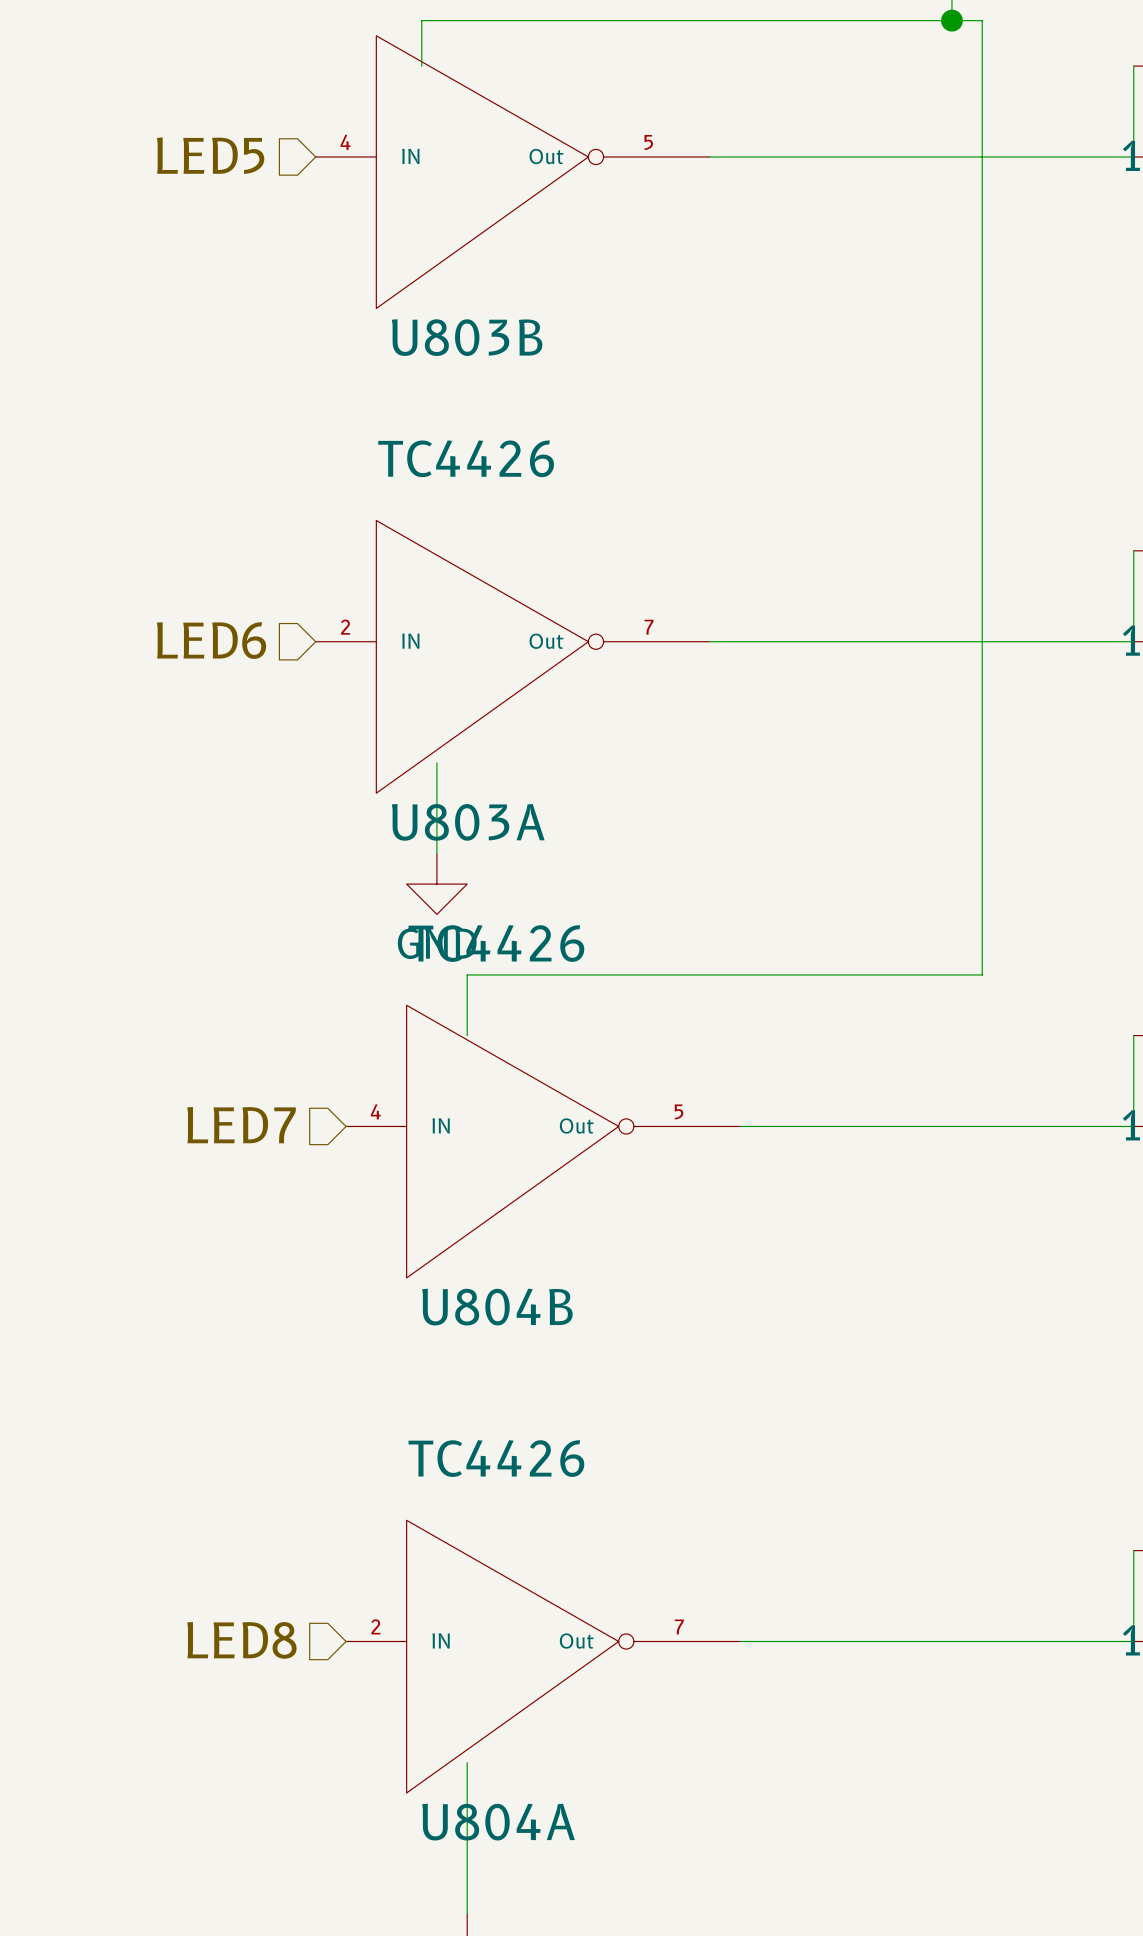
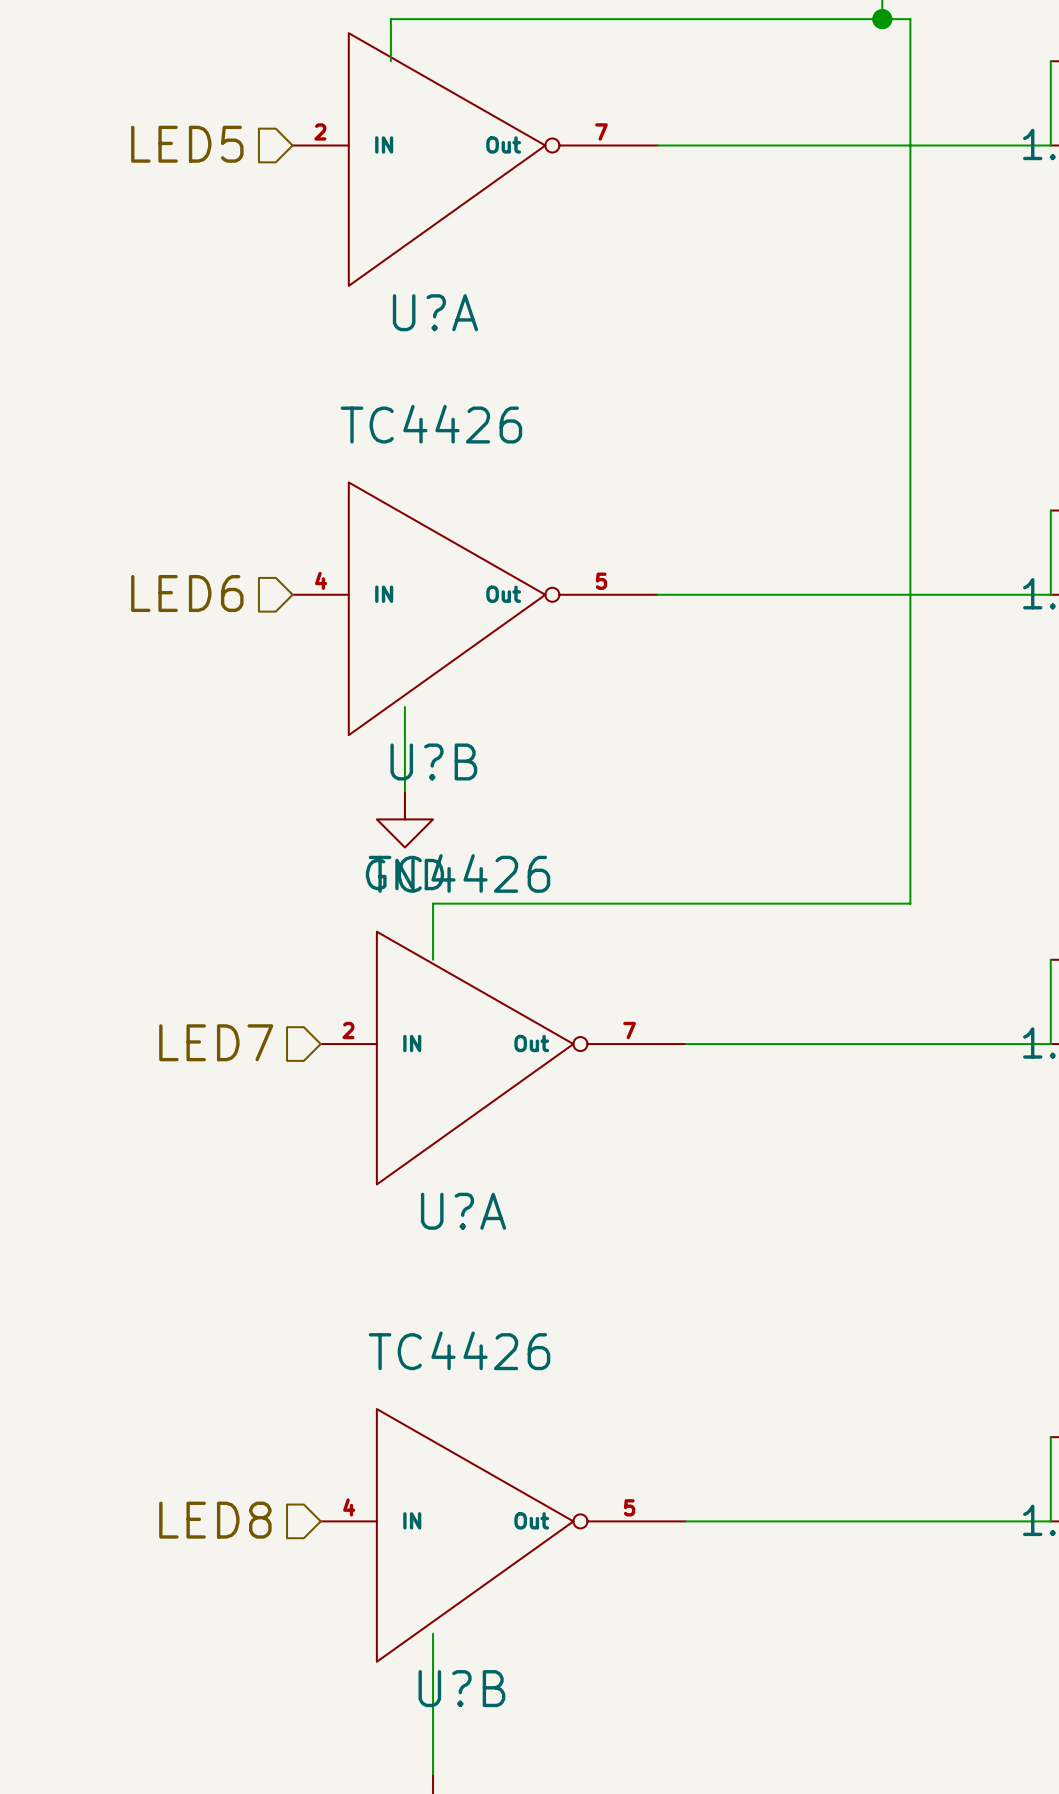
U803B pin number: 4 (345, 142) -> 2 (320, 131)
U803B pin number: 5 (648, 142) -> 7 (601, 131)
U803B name: U803B (467, 337) -> U?A (435, 312)
U803A pin number: 2 (345, 627) -> 4 (321, 580)
U803A pin number: 7 (649, 627) -> 5 (601, 581)
U803A name: U803A (468, 822) -> U?B (433, 761)
U804B pin number: 4 (375, 1111) -> 2 (348, 1030)
U804B pin number: 5 (679, 1111) -> 7 (629, 1030)
U804B name: U804B (497, 1307) -> U?A (463, 1211)
U804A pin number: 2 (375, 1626) -> 4 (349, 1507)
U804A pin number: 7 (679, 1626) -> 5 (629, 1507)
U804A name: U804A (498, 1822) -> U?B (461, 1688)

